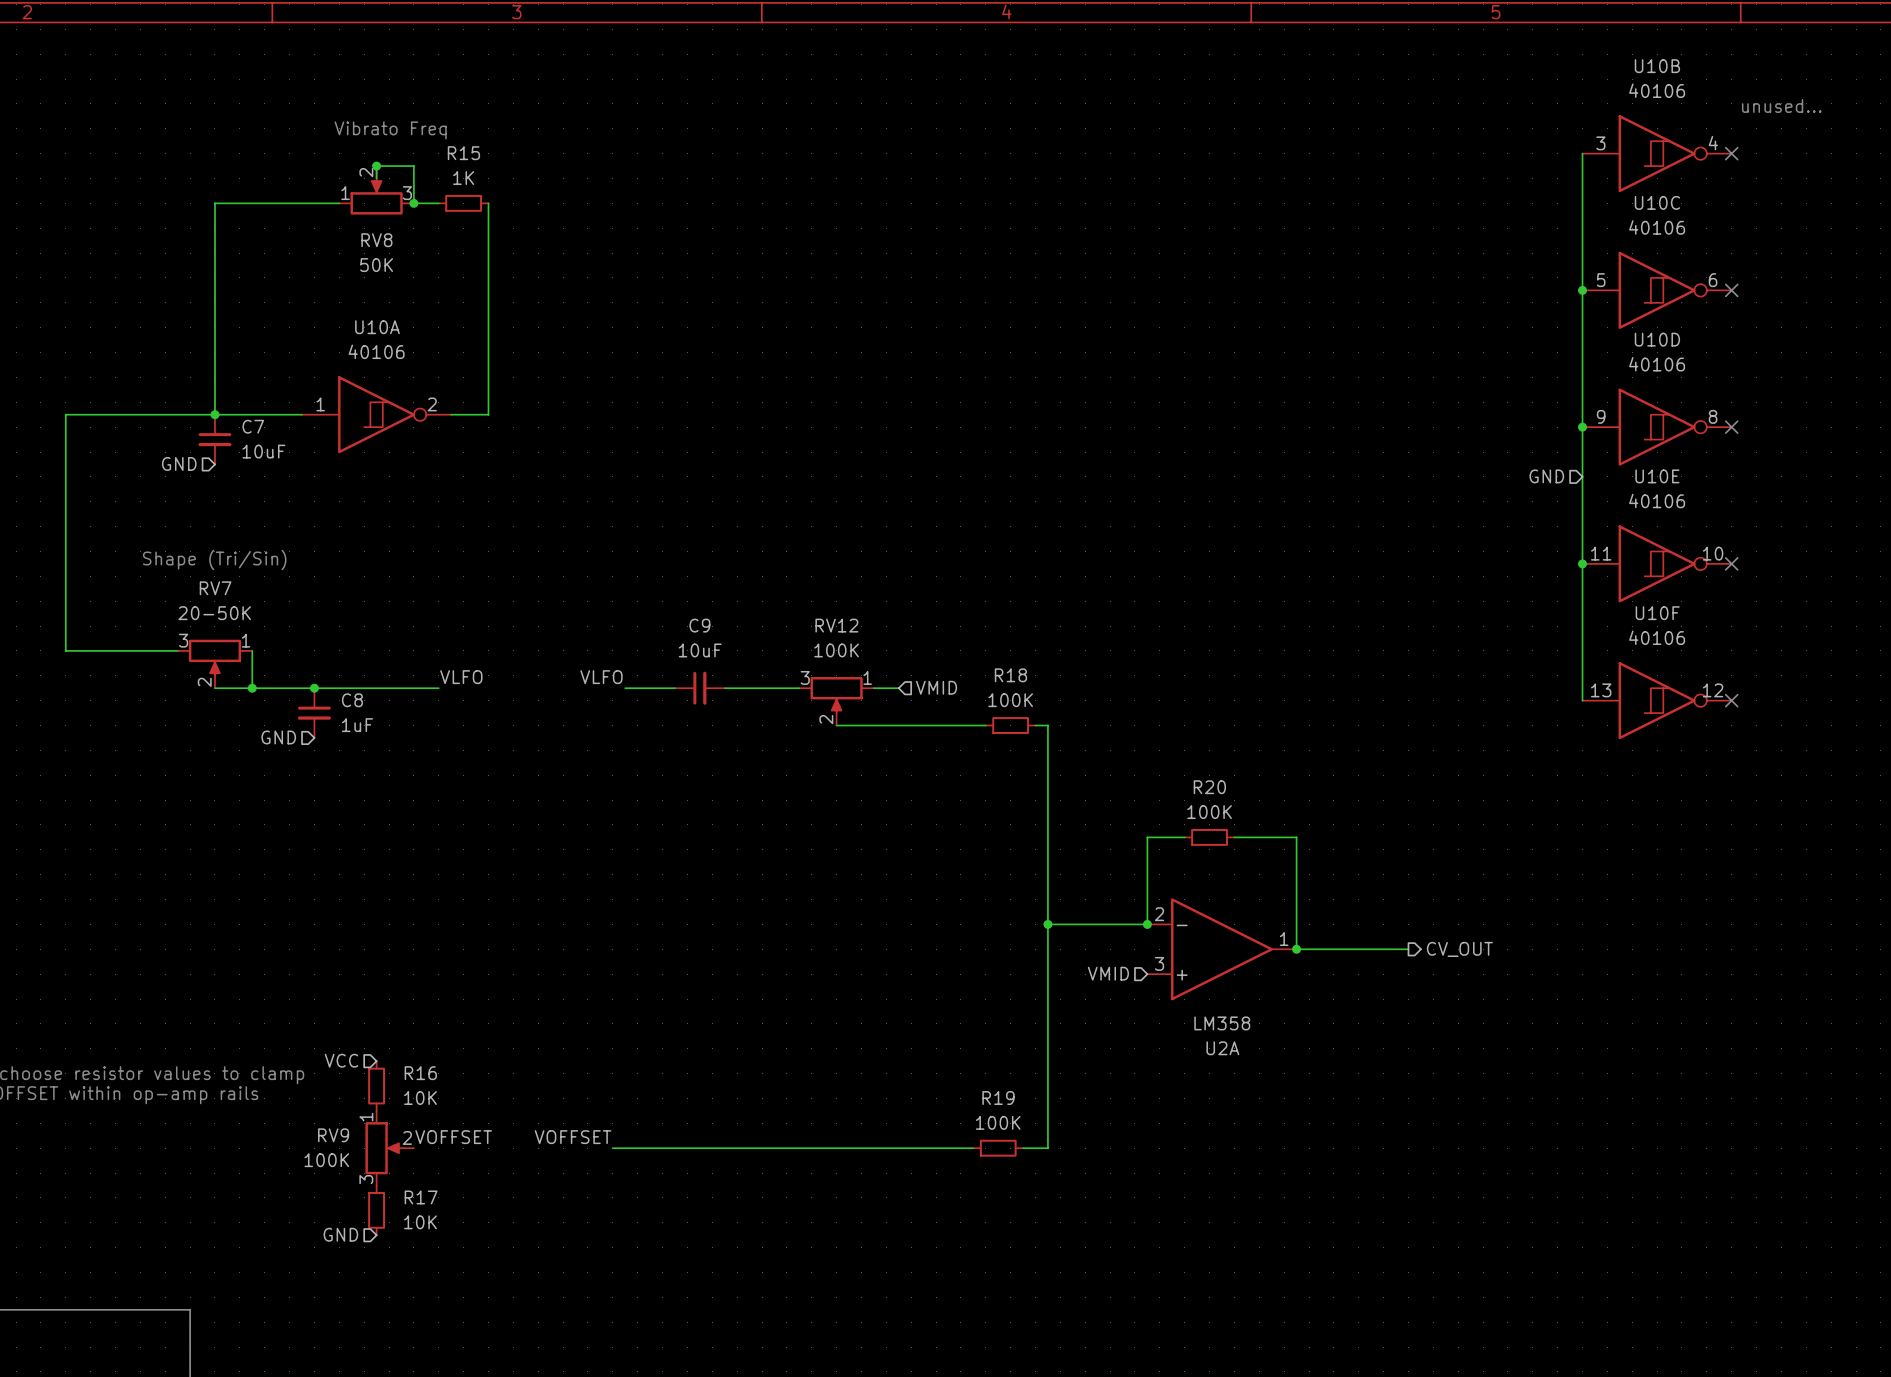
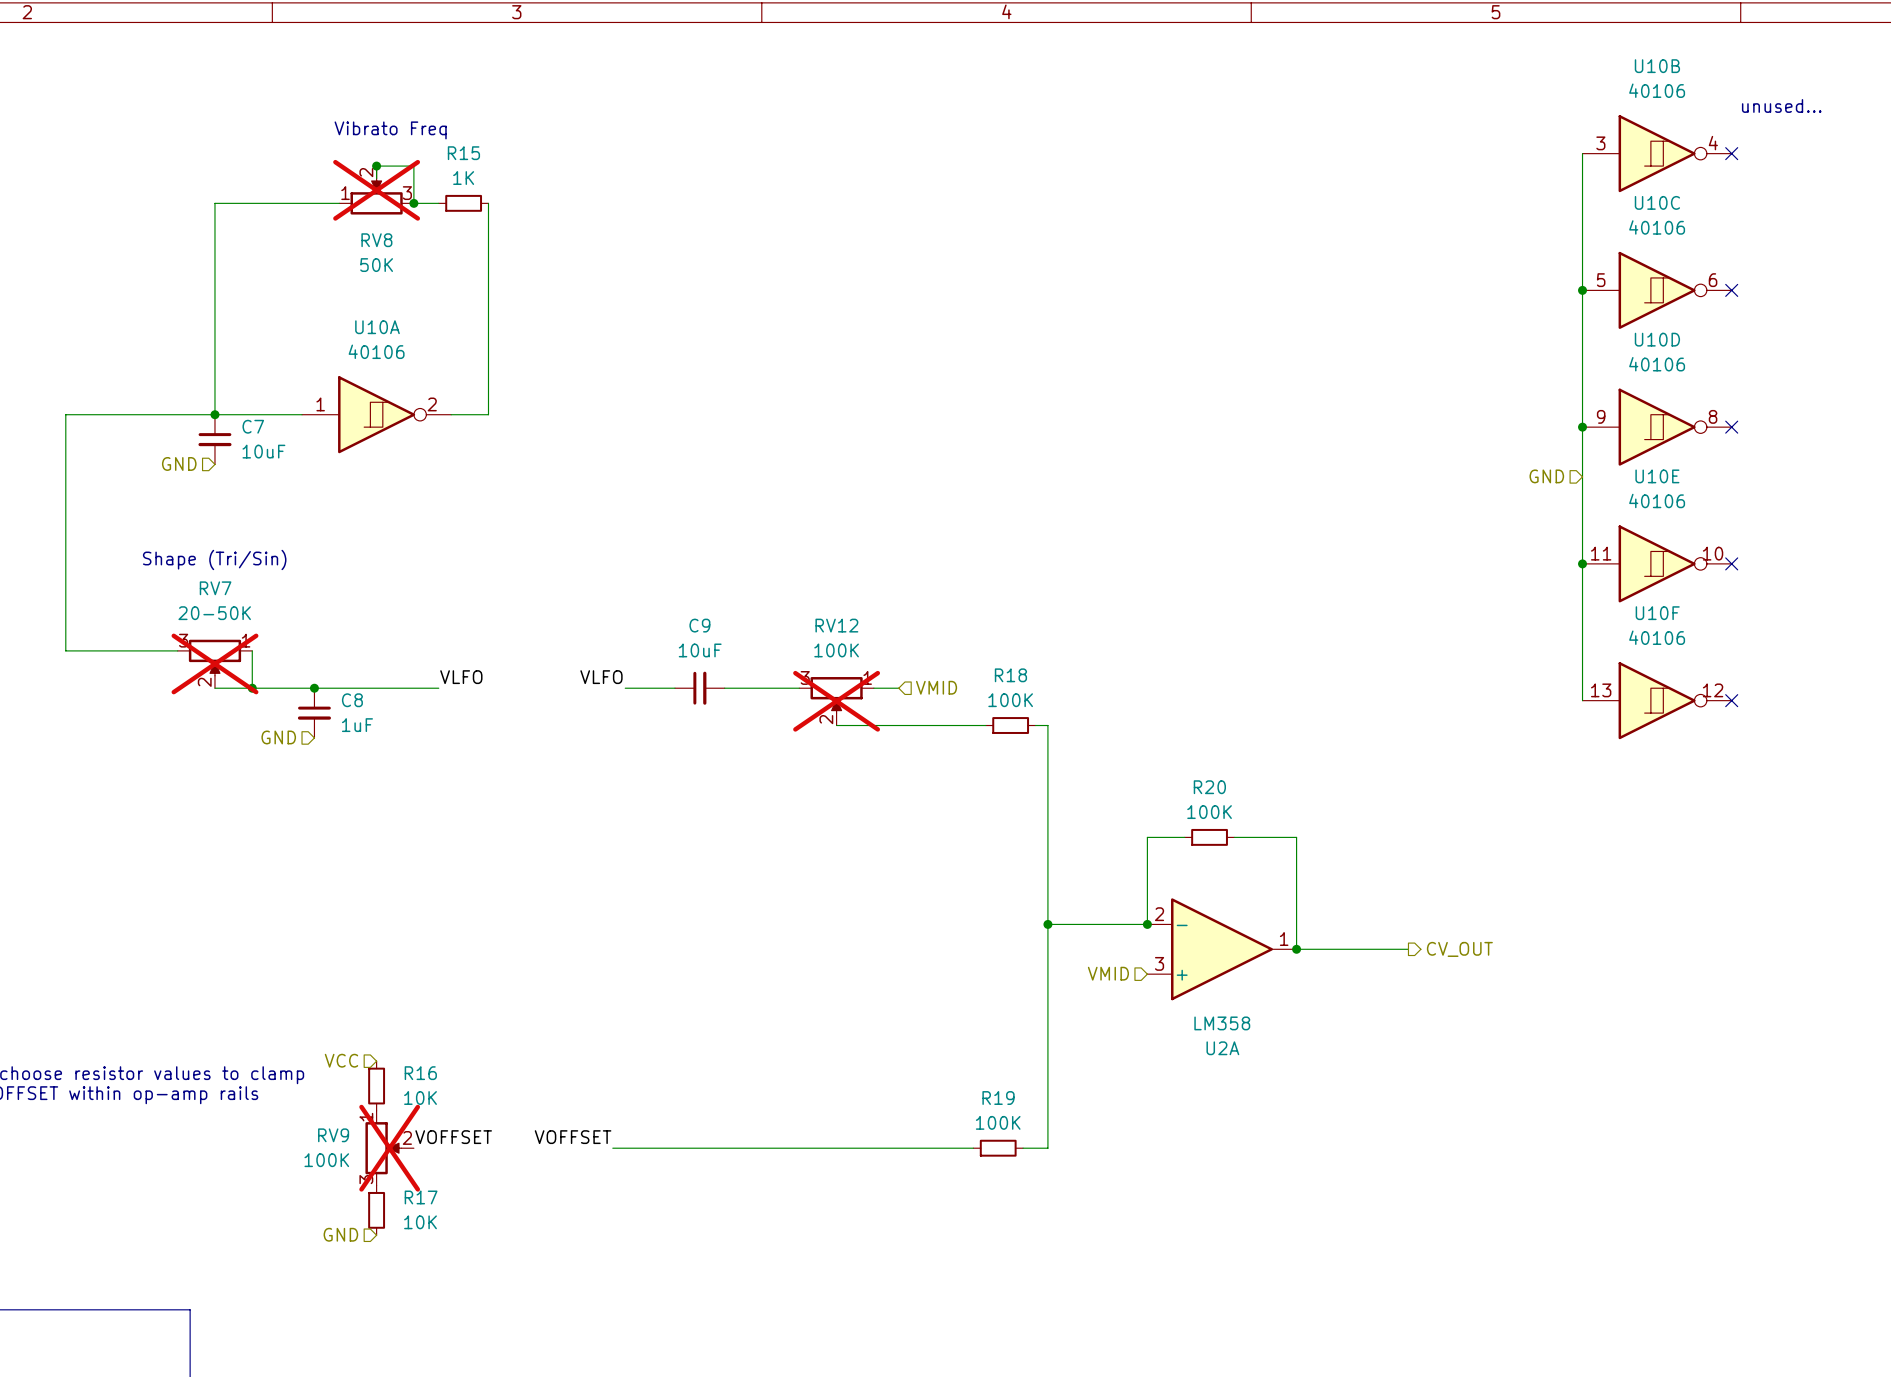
RV8 do-not-place cross: none -> (376, 190)
RV7 do-not-place cross: none -> (214, 663)
RV12 do-not-place cross: none -> (836, 701)
RV9 do-not-place cross: none -> (389, 1148)

